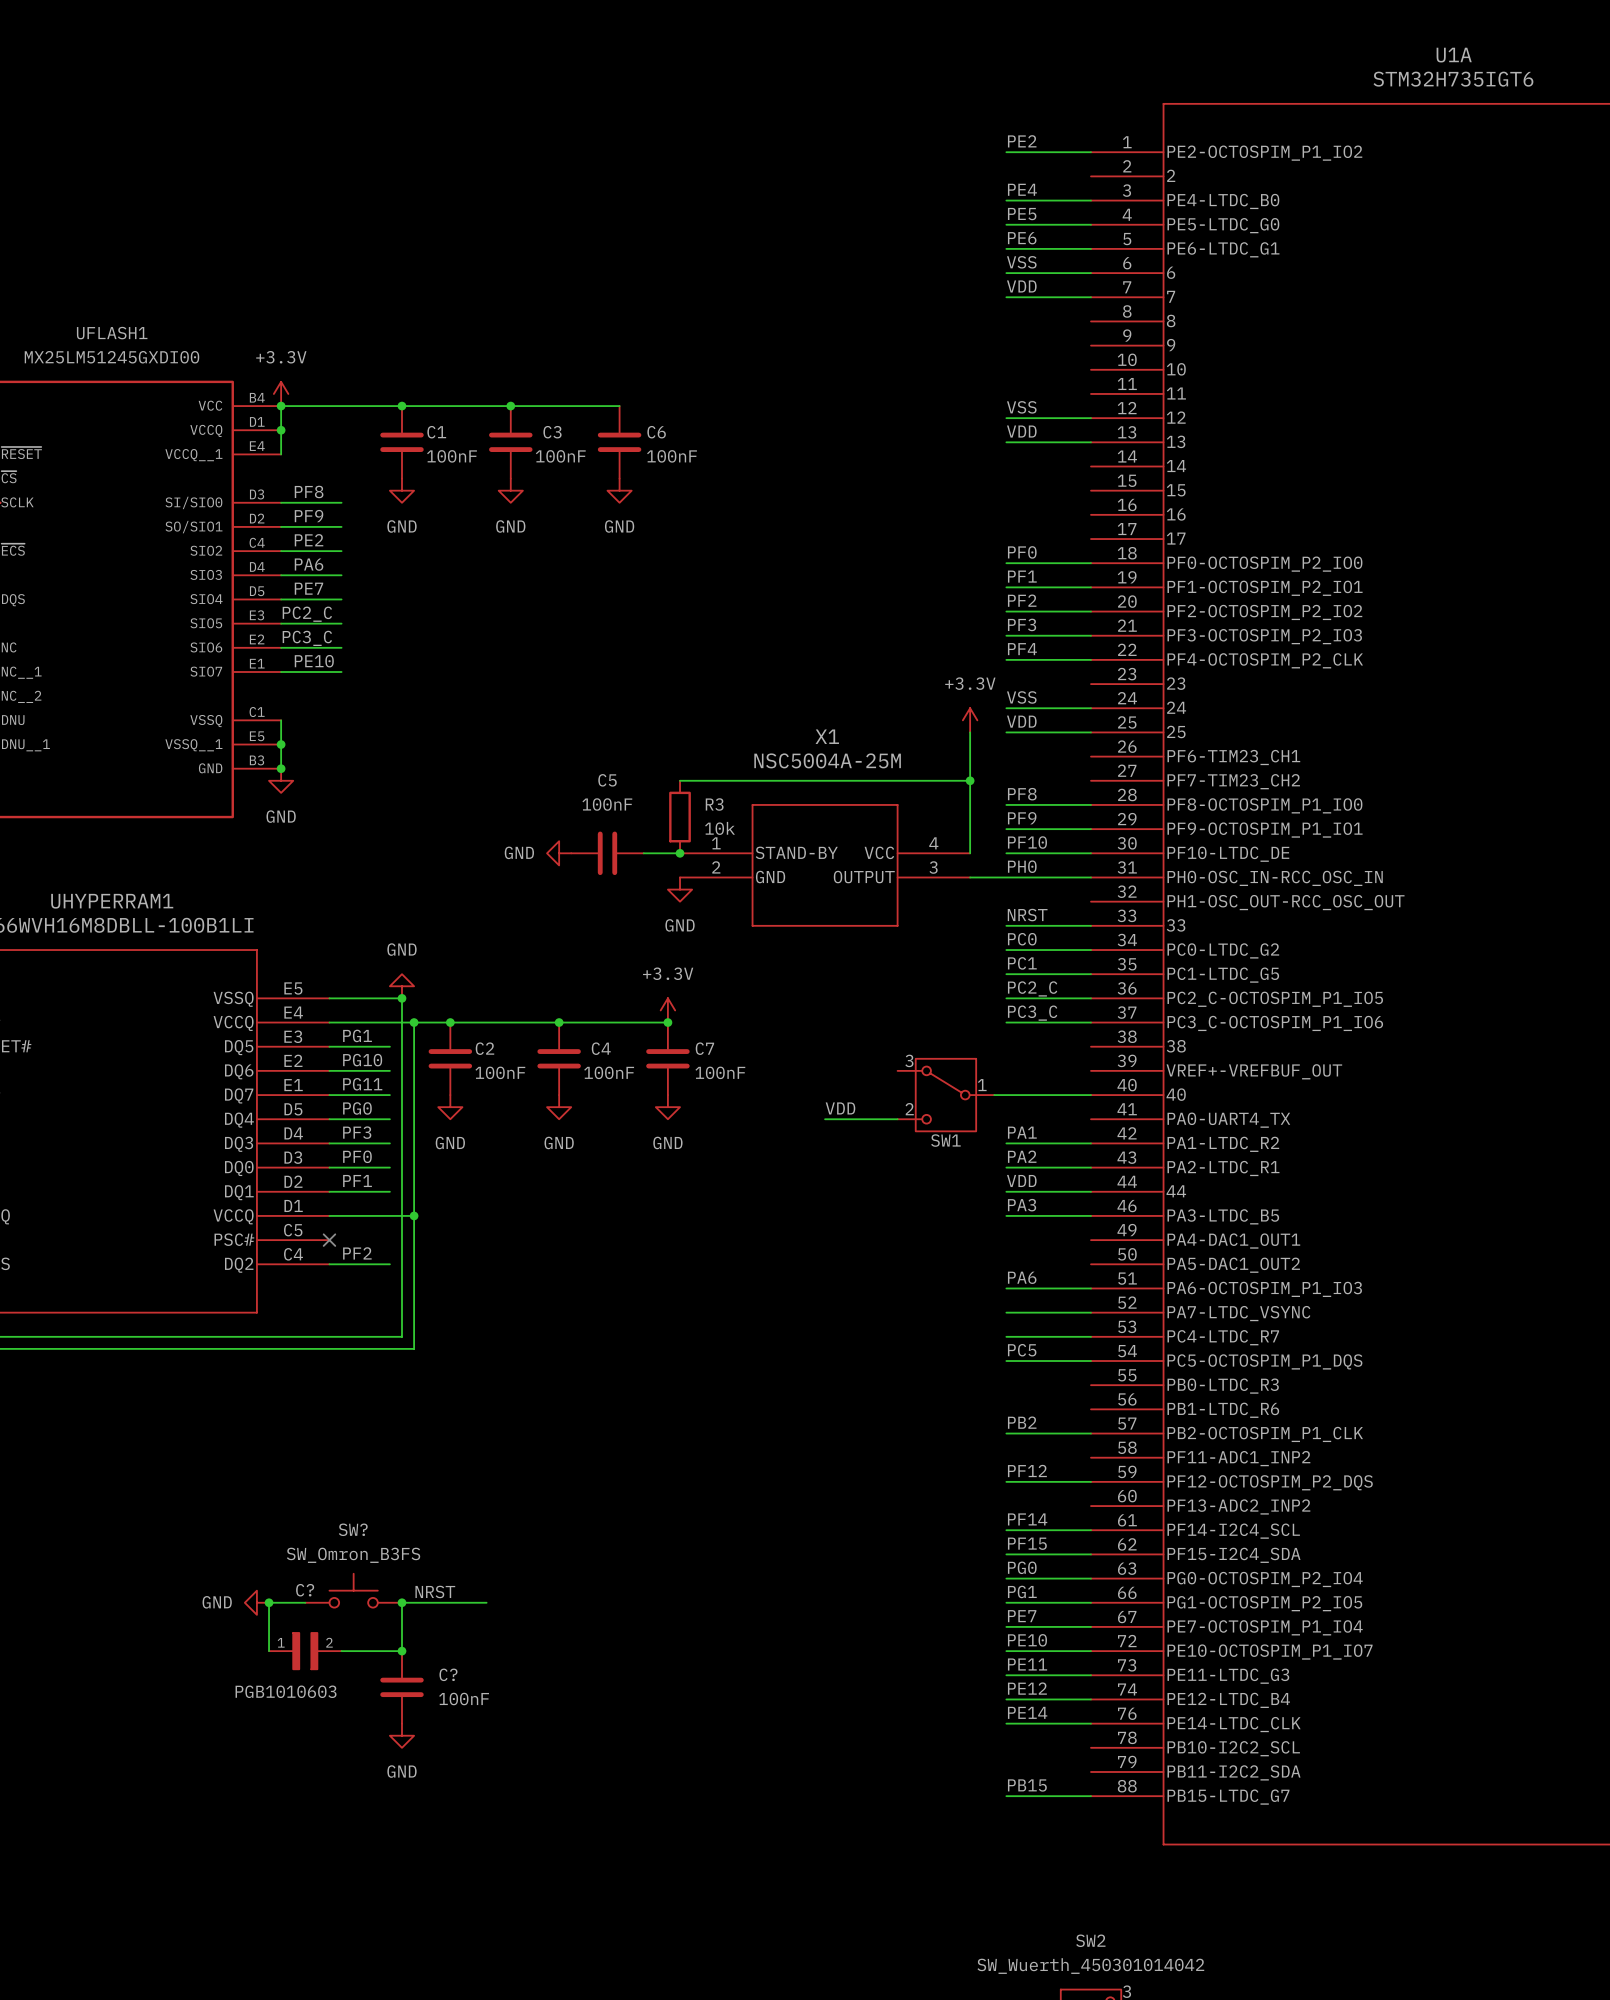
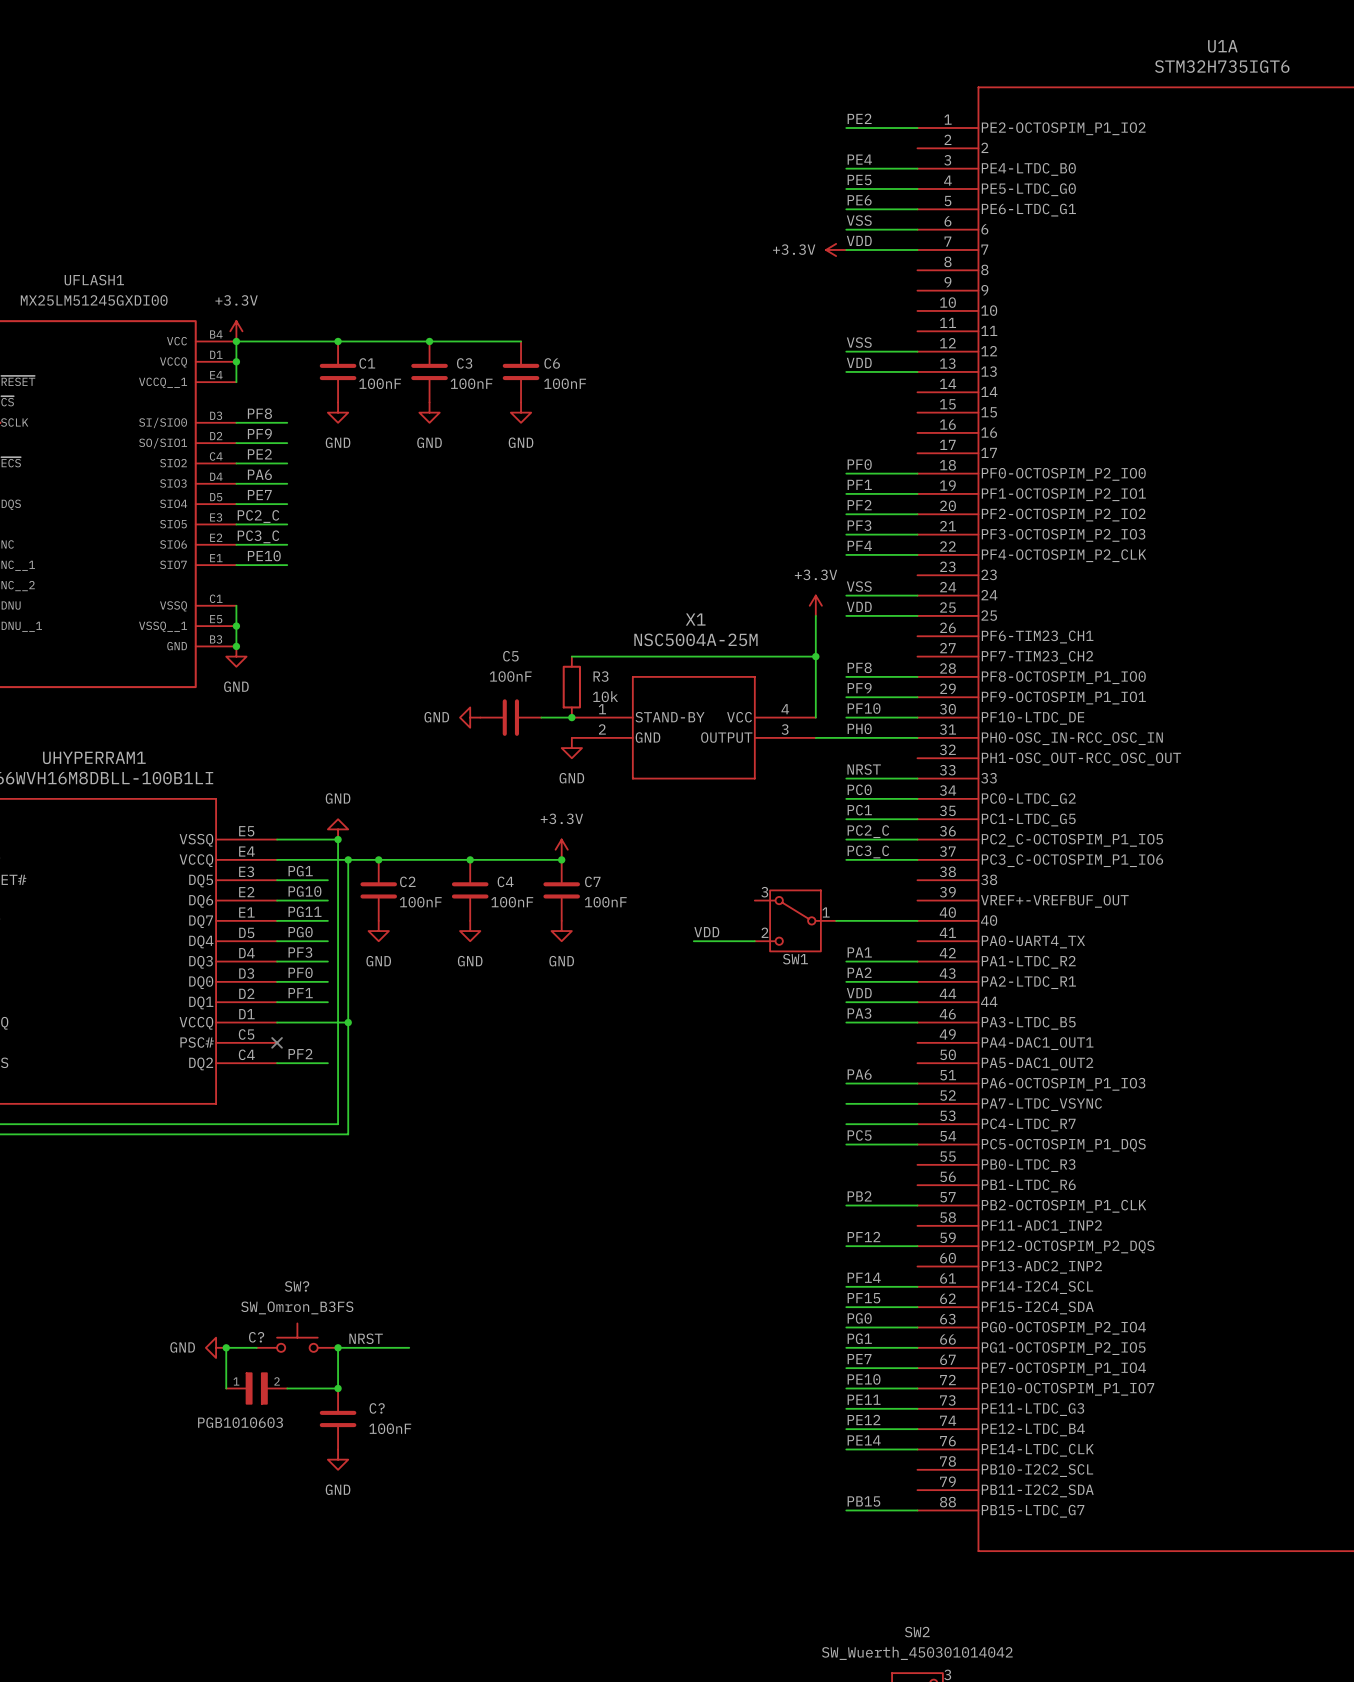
power symbol: none -> +3.3V (836, 249)

